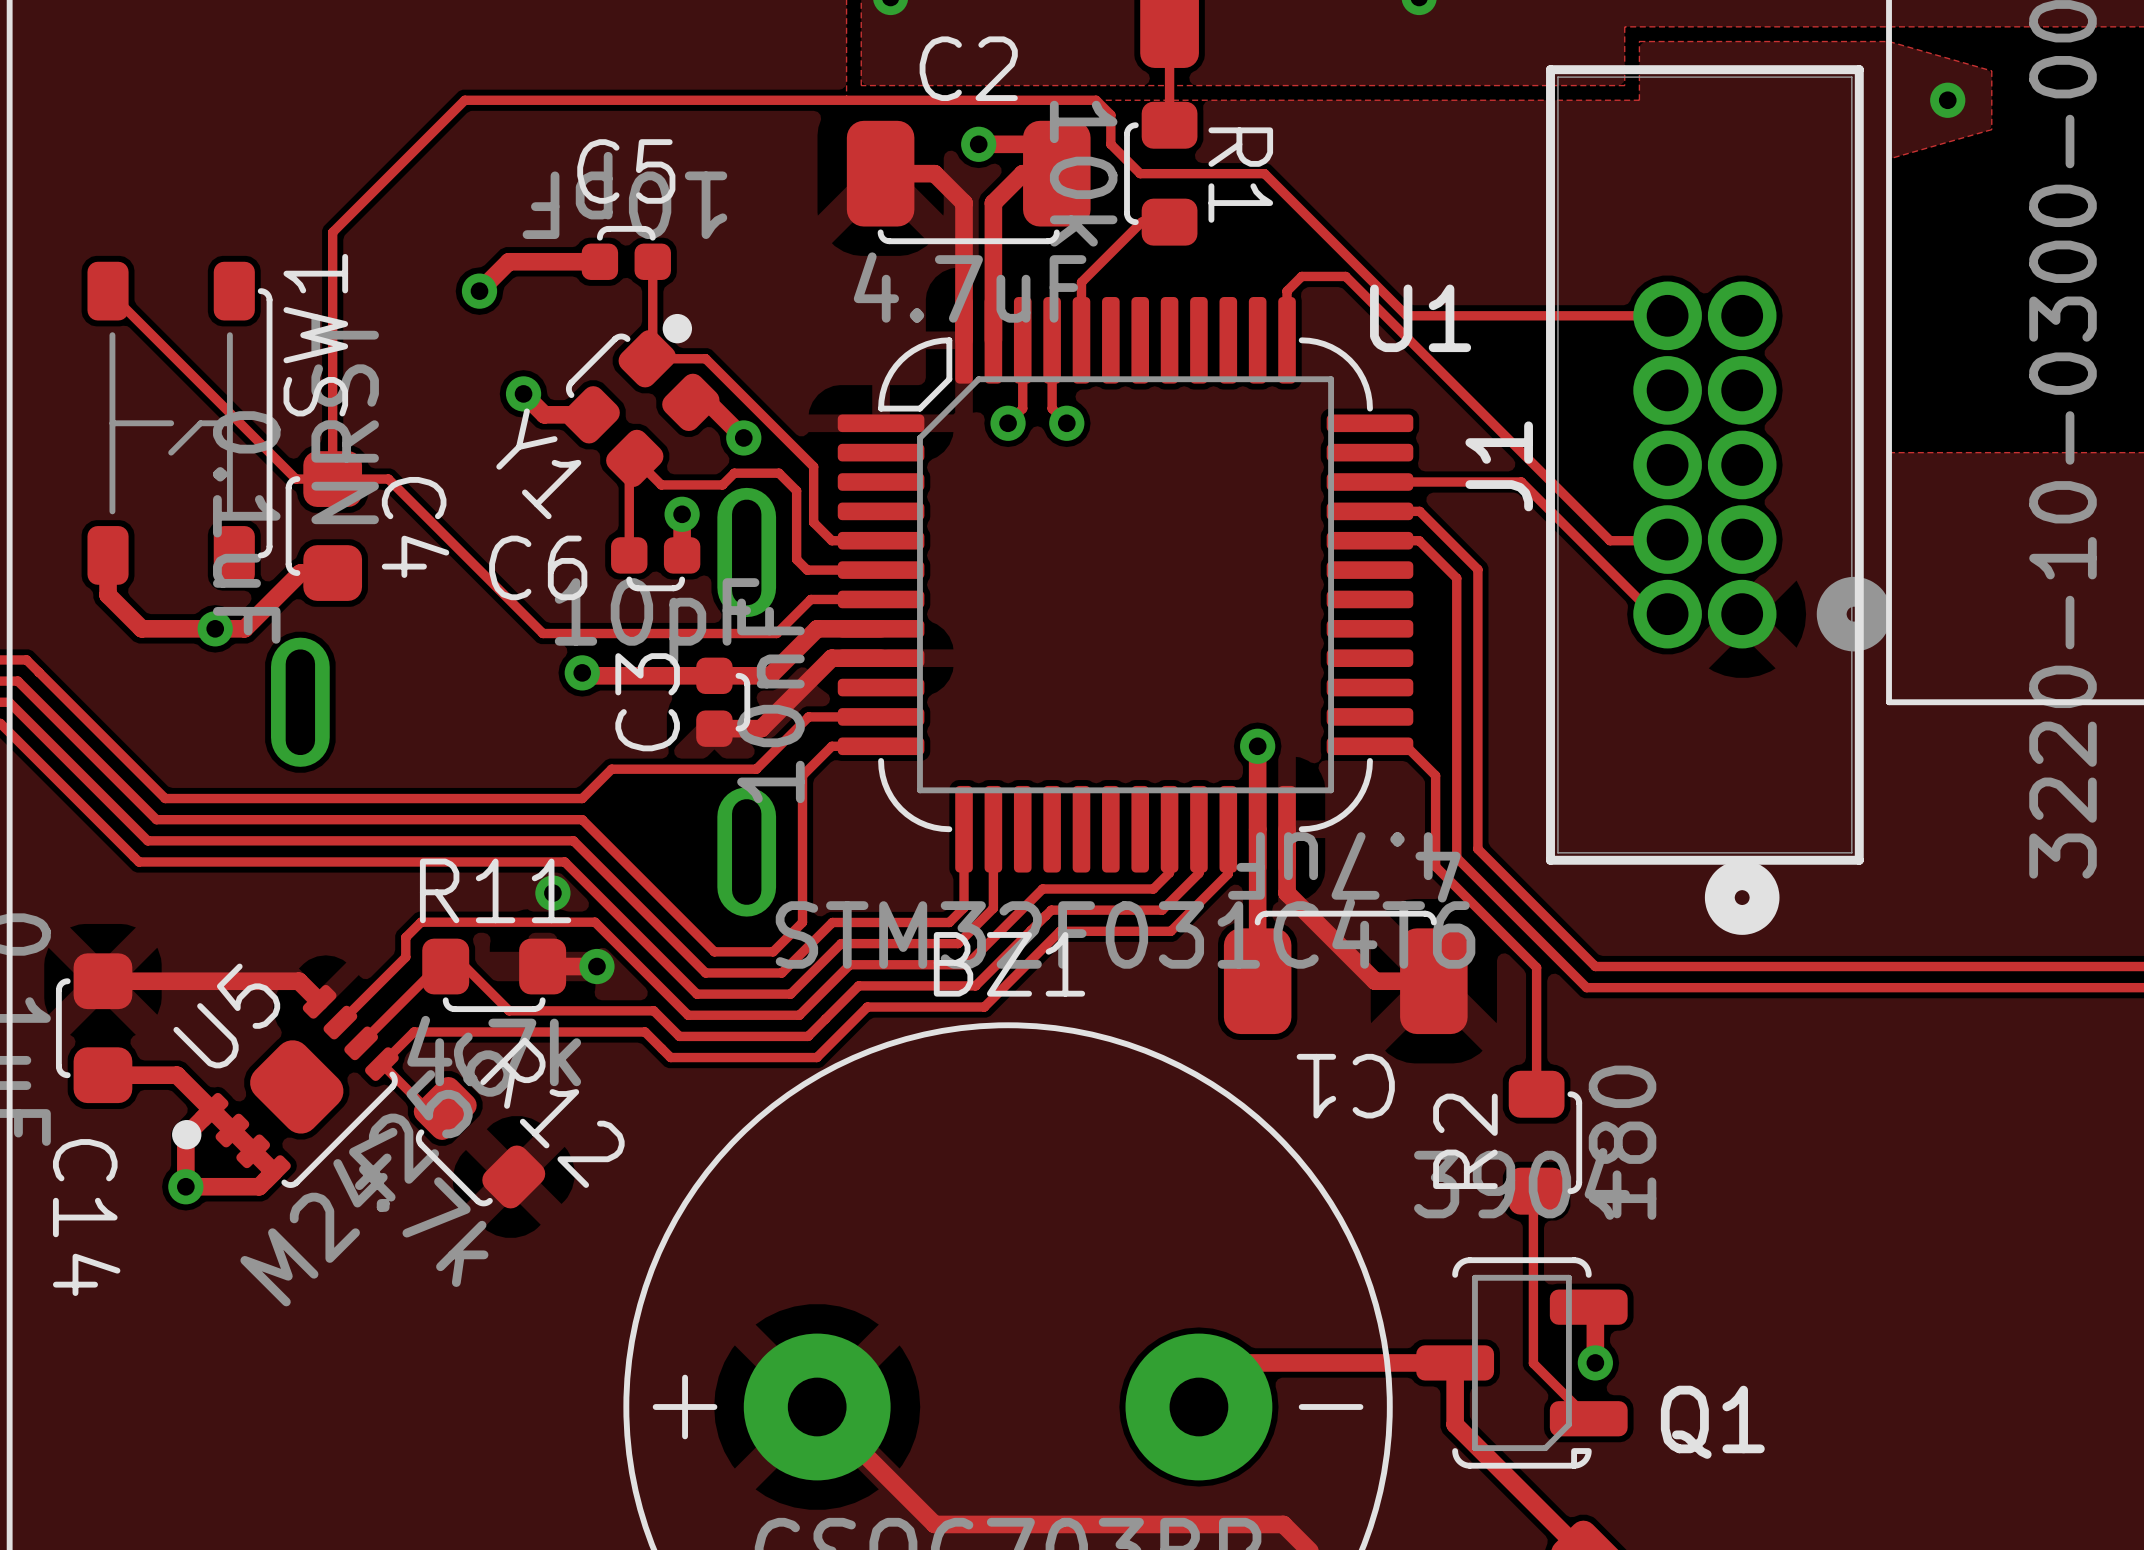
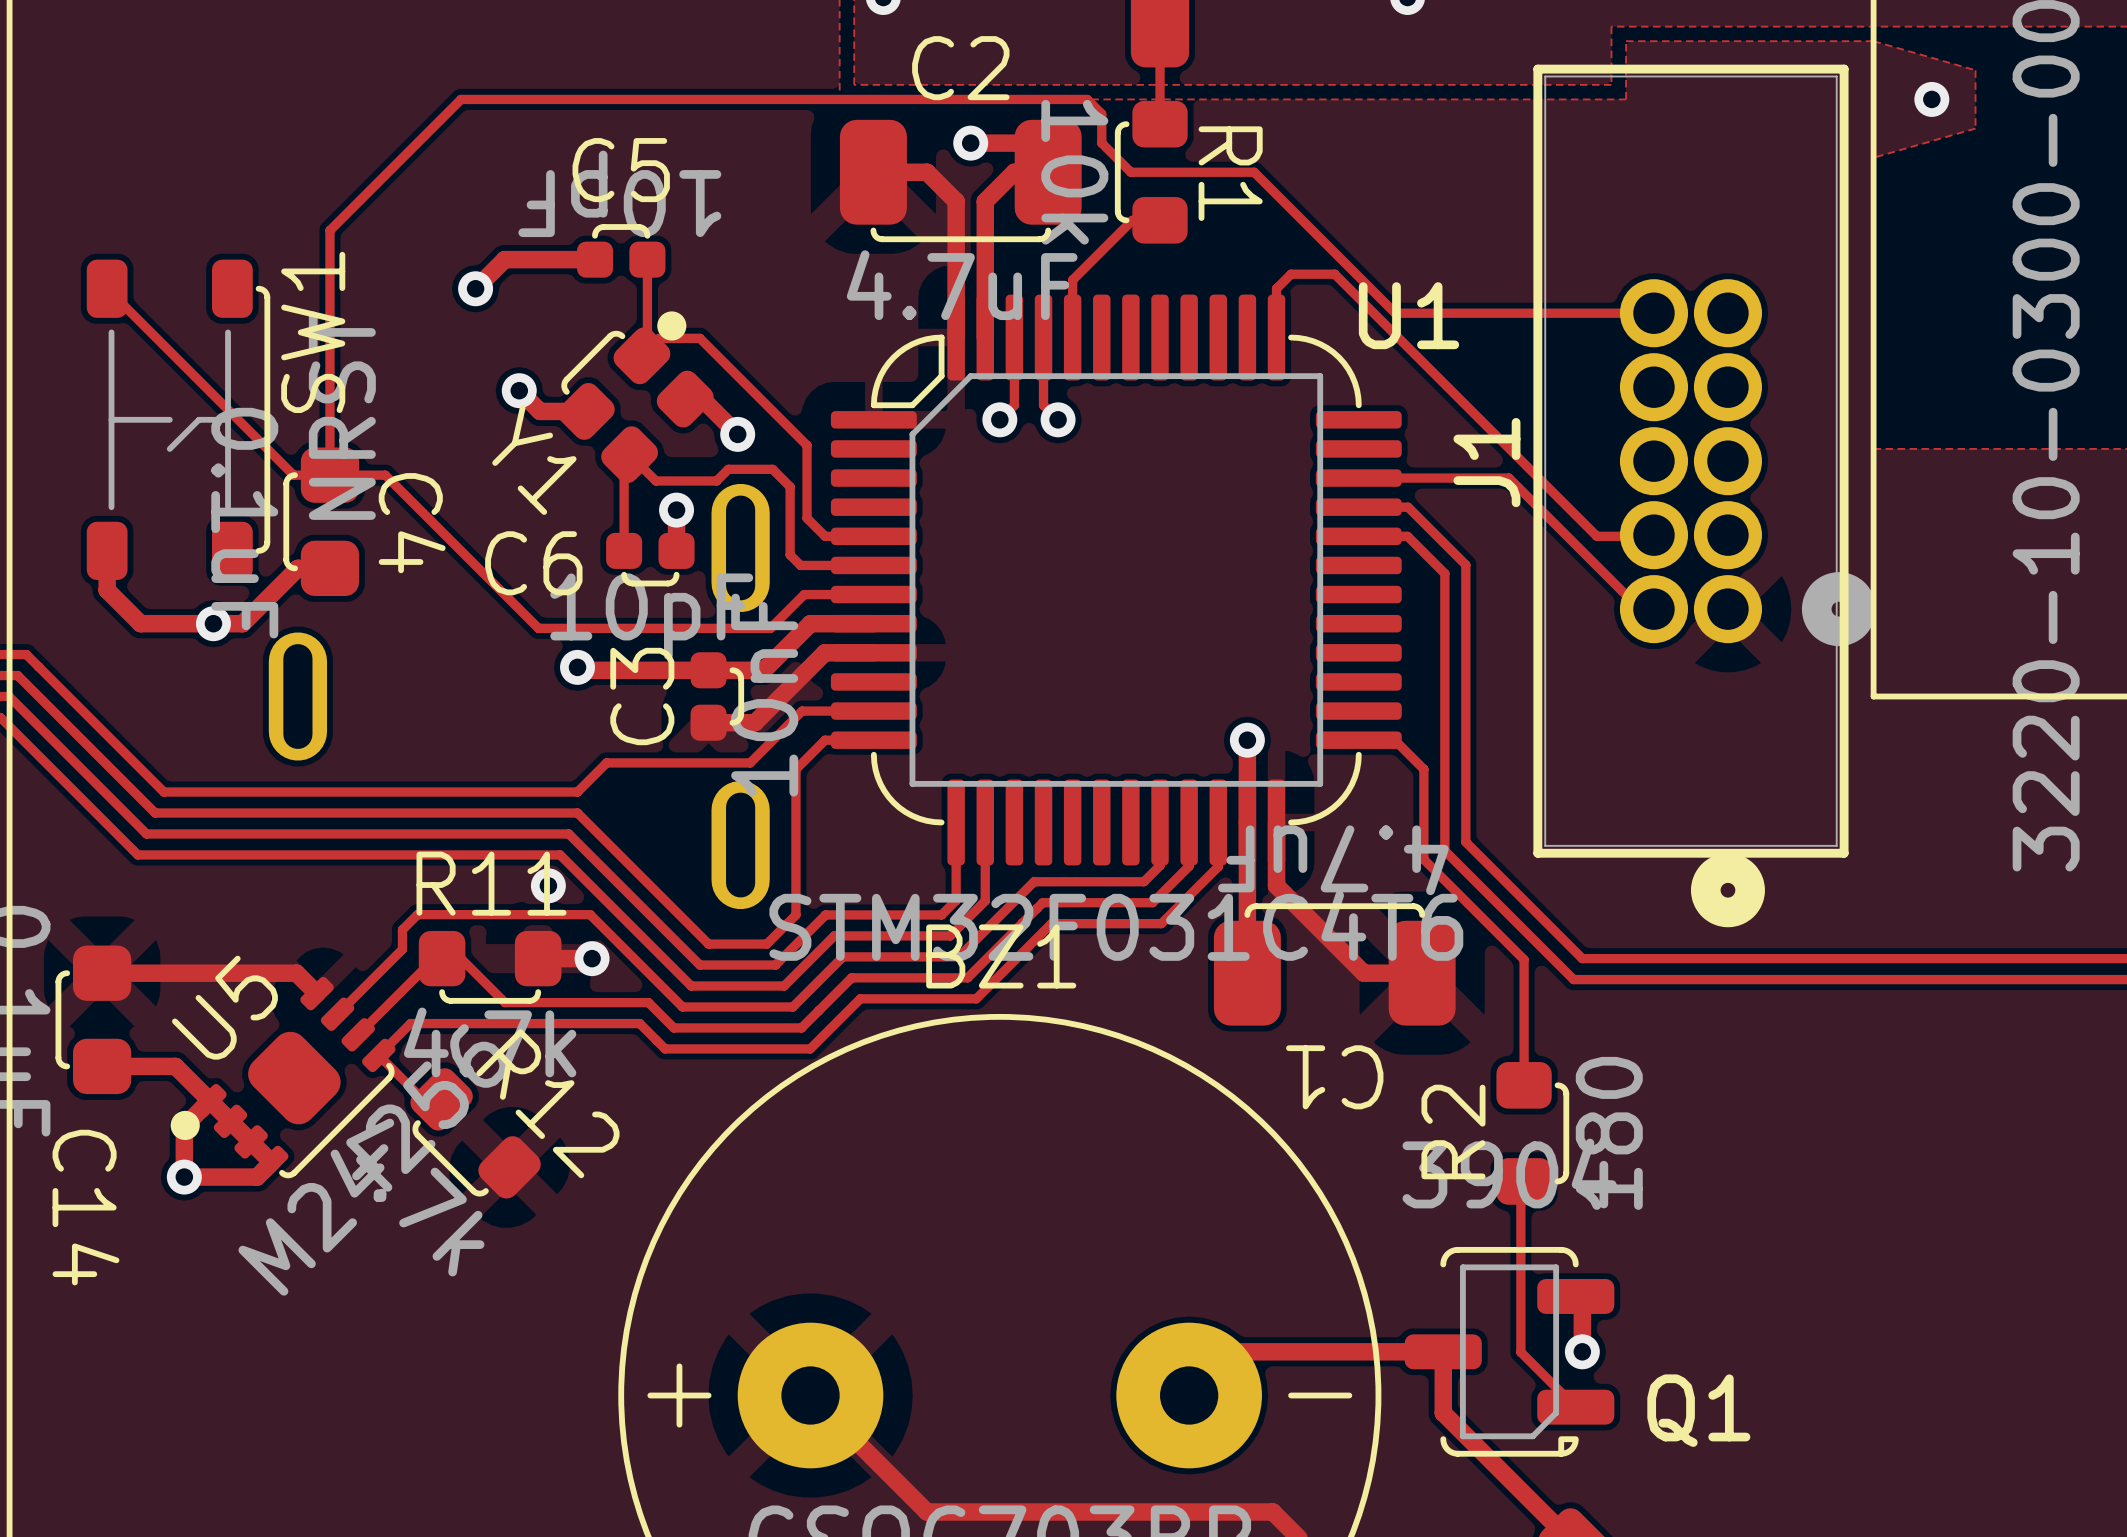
track: (647, 358) (705, 358) (813, 466) -> (647, 350) (659, 338) (699, 338) (807, 445) (807, 462)

